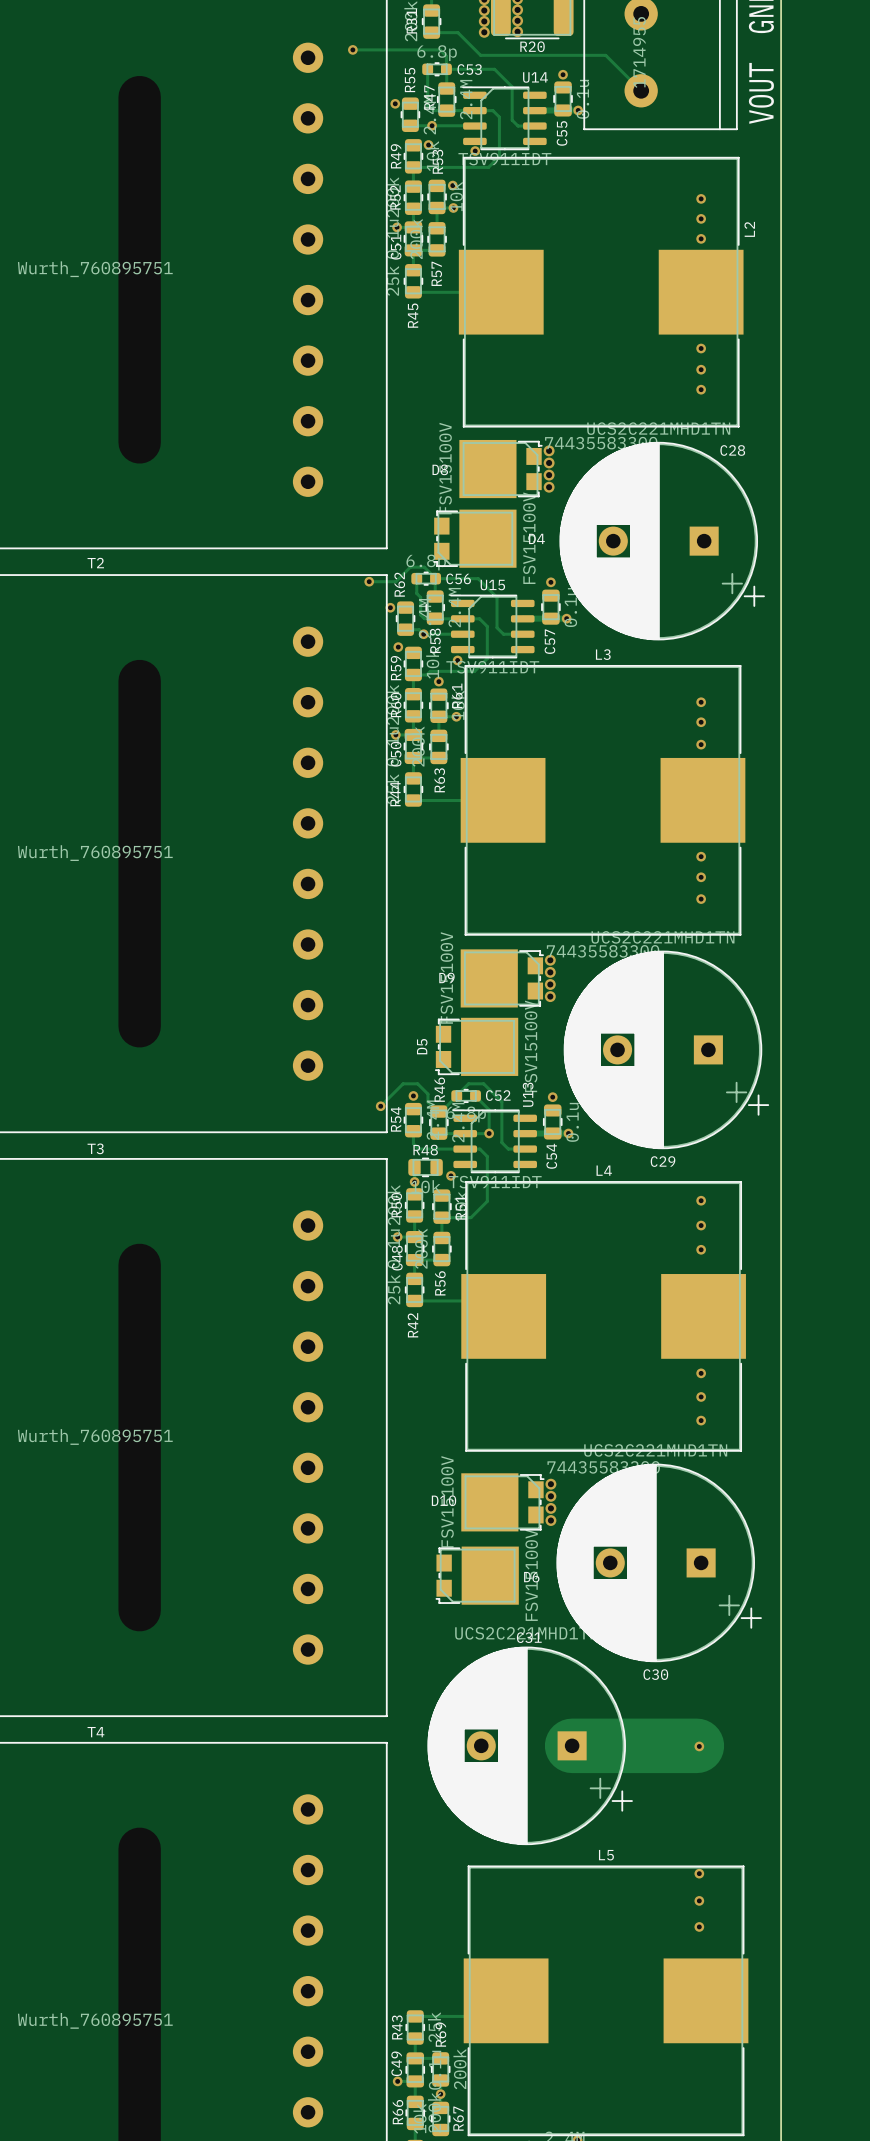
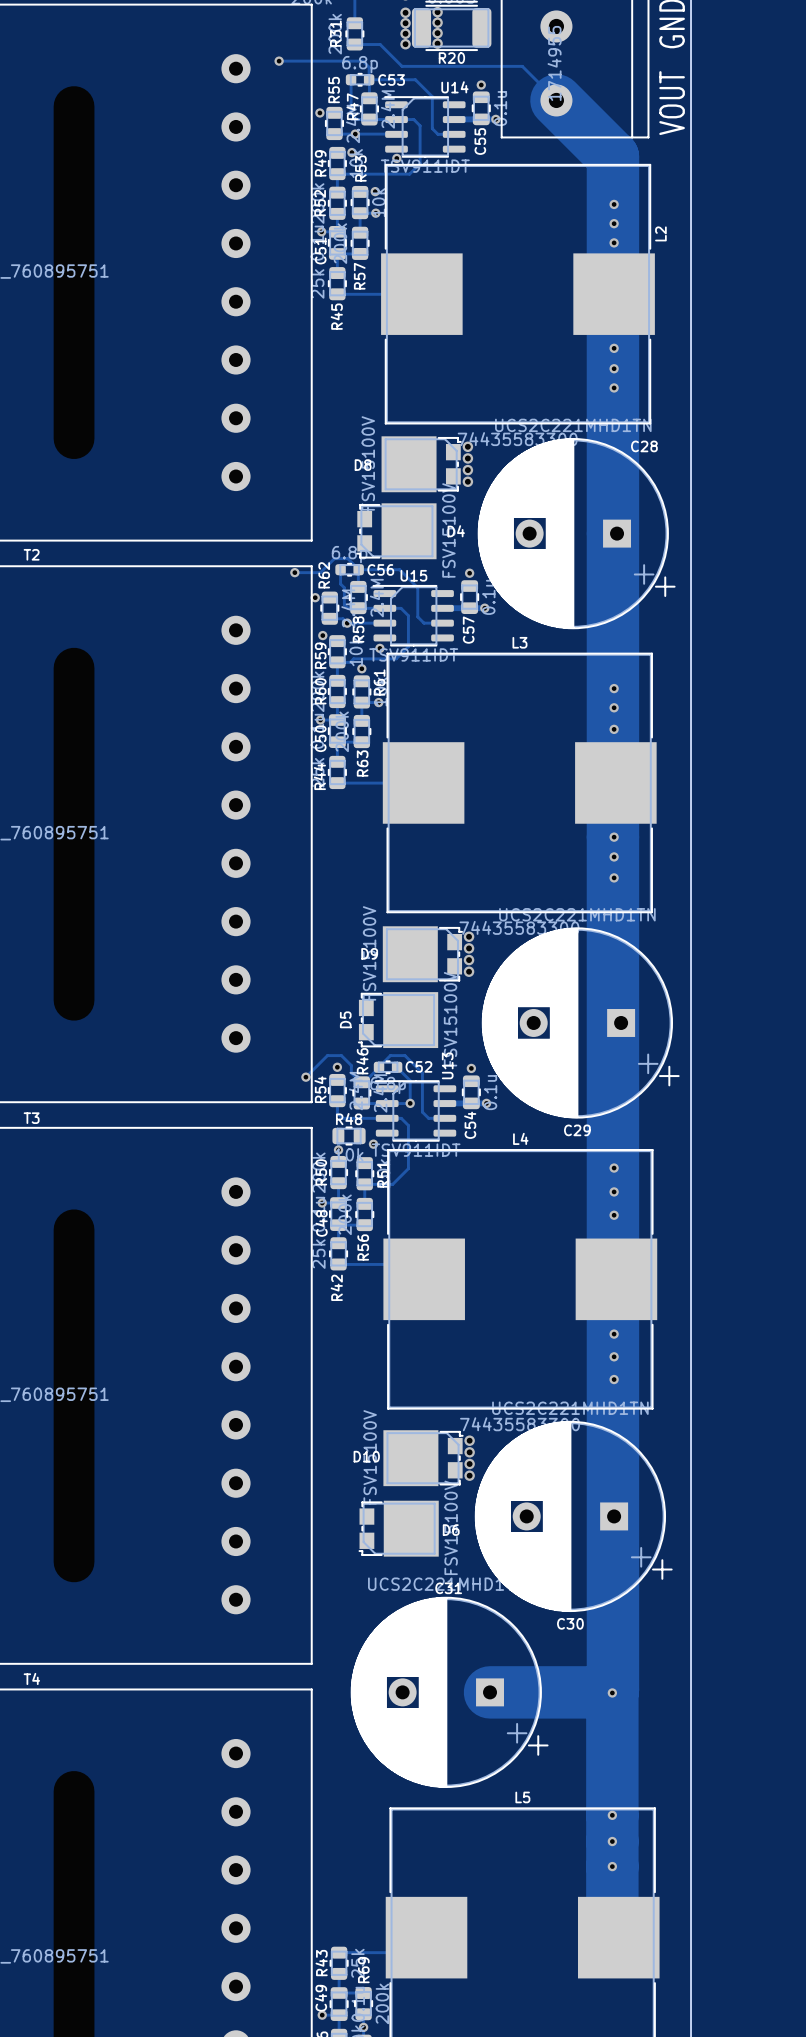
track: none -> (556, 100) (612, 156) (612, 533)
track: none -> (612, 534) (612, 1689) (610, 1692)
track: none -> (612, 1690) (612, 1931)

